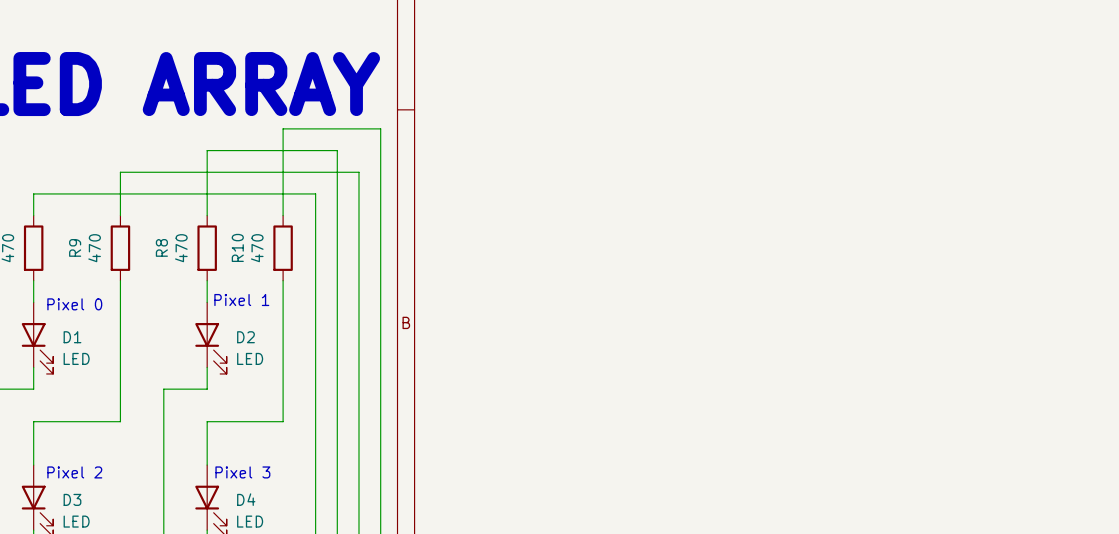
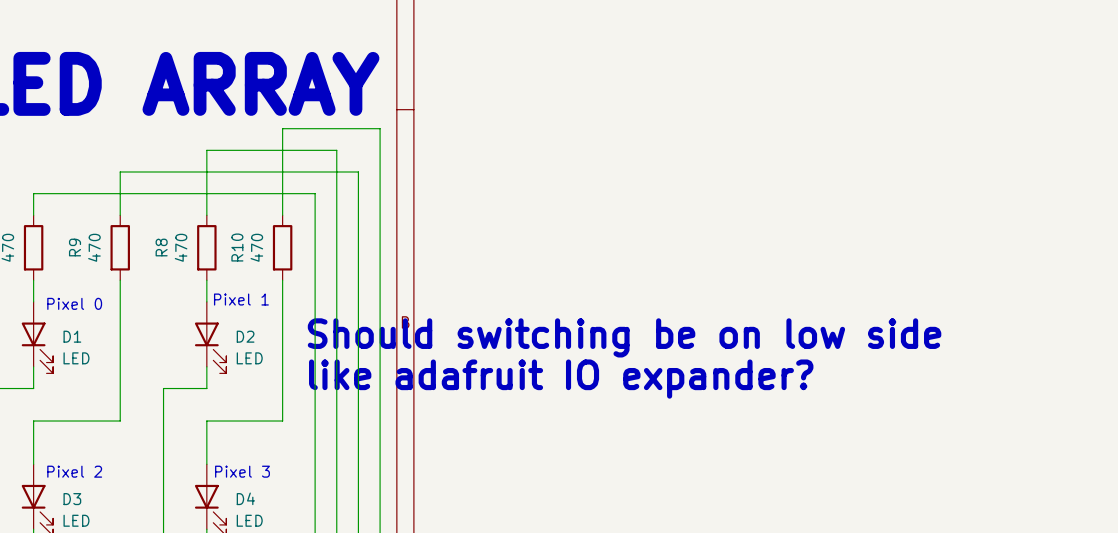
text: none -> Should switching be on low side (624, 337)
text: none -> like adafruit IO expander? (561, 379)

